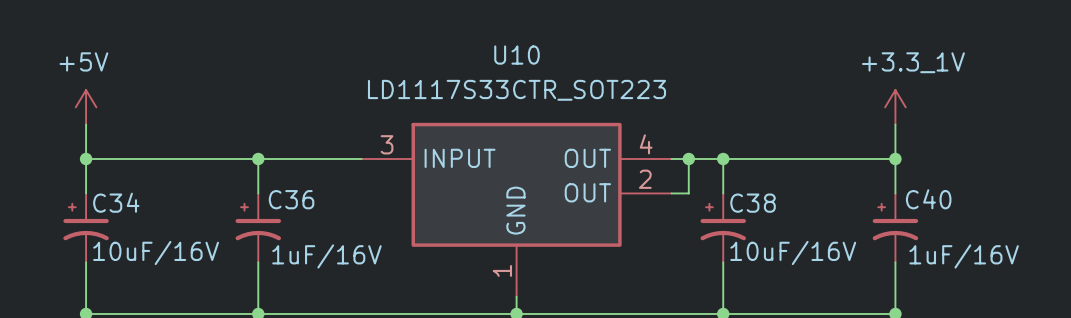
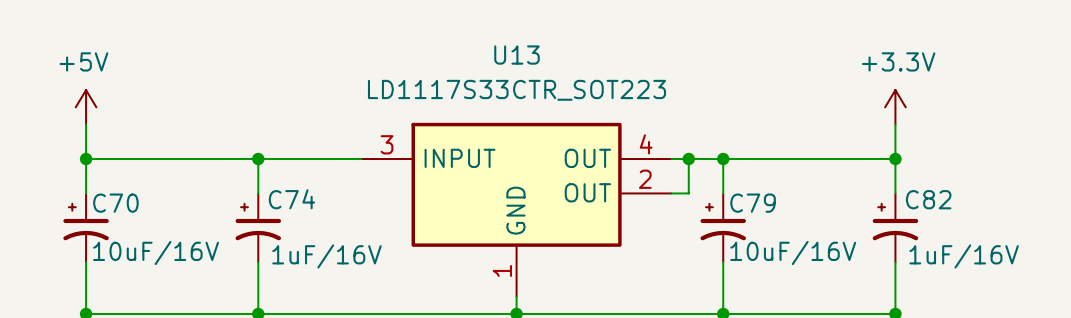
U10 name: U10 (516, 55) -> U13 (516, 55)
power symbol: +3.3_1V (895, 107) -> +3.3V (895, 107)
C36 name: C36 (291, 199) -> C74 (291, 199)
C40 name: C40 (928, 199) -> C82 (928, 199)
C34 name: C34 (116, 202) -> C70 (115, 203)
C38 name: C38 (753, 203) -> C79 (753, 203)

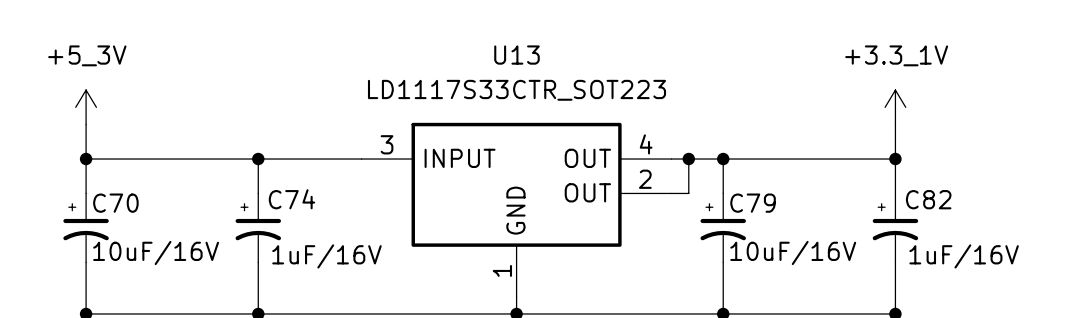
power symbol: +5V (86, 107) -> +5_3V (86, 107)
power symbol: +3.3V (895, 107) -> +3.3_1V (895, 107)

